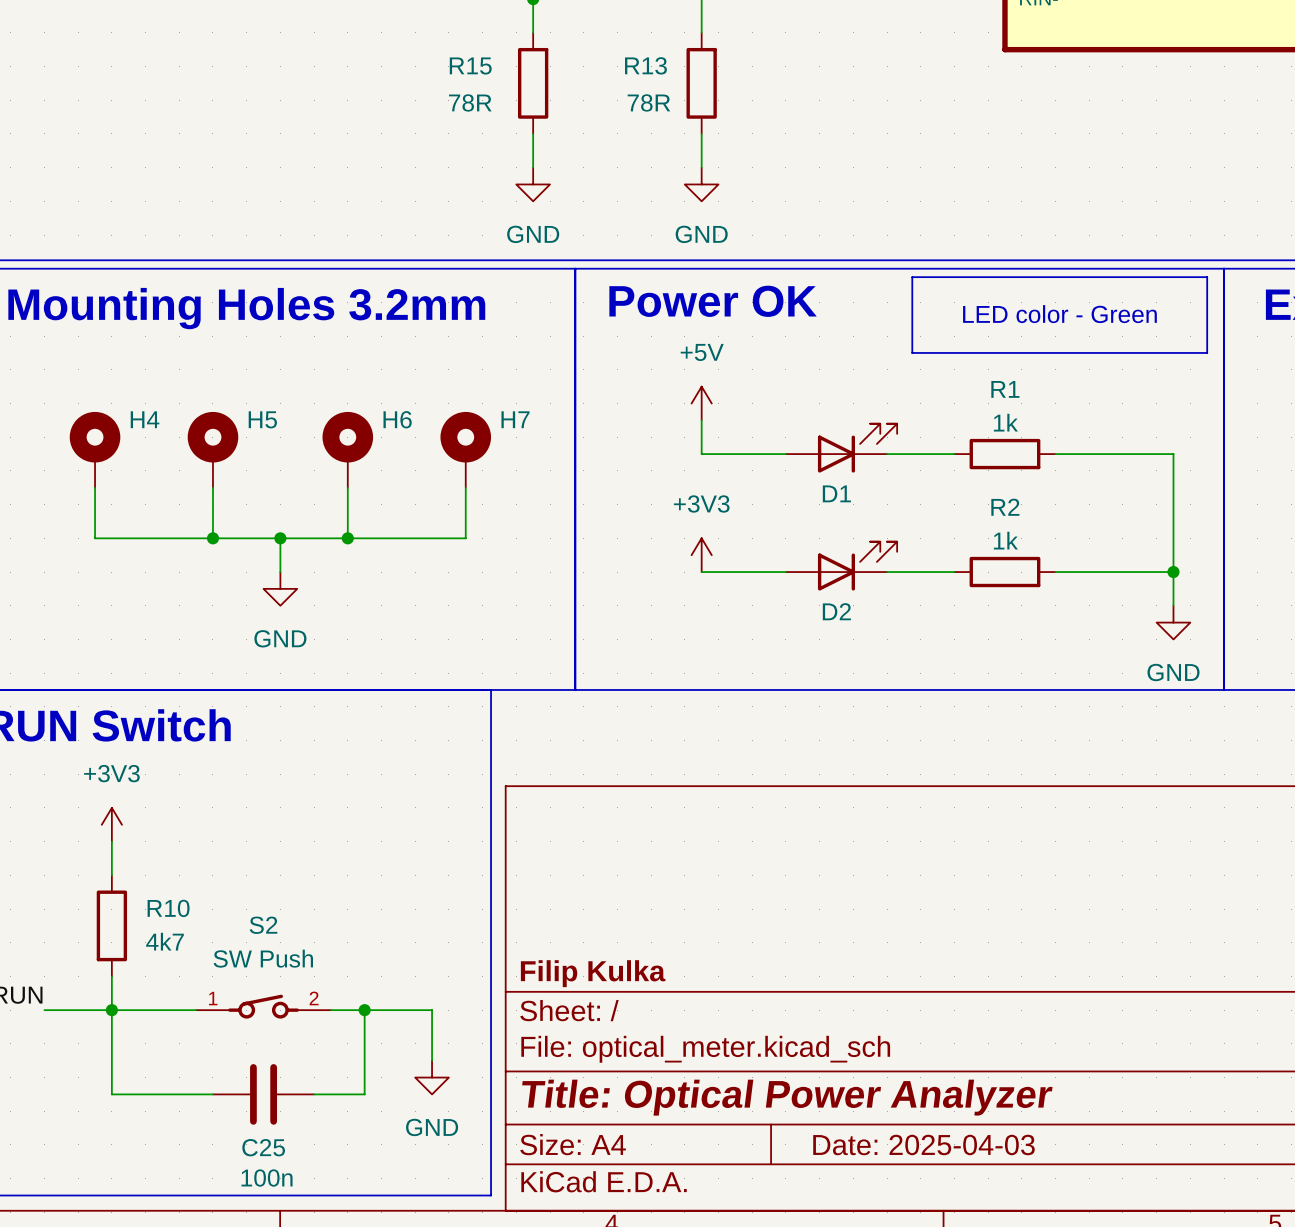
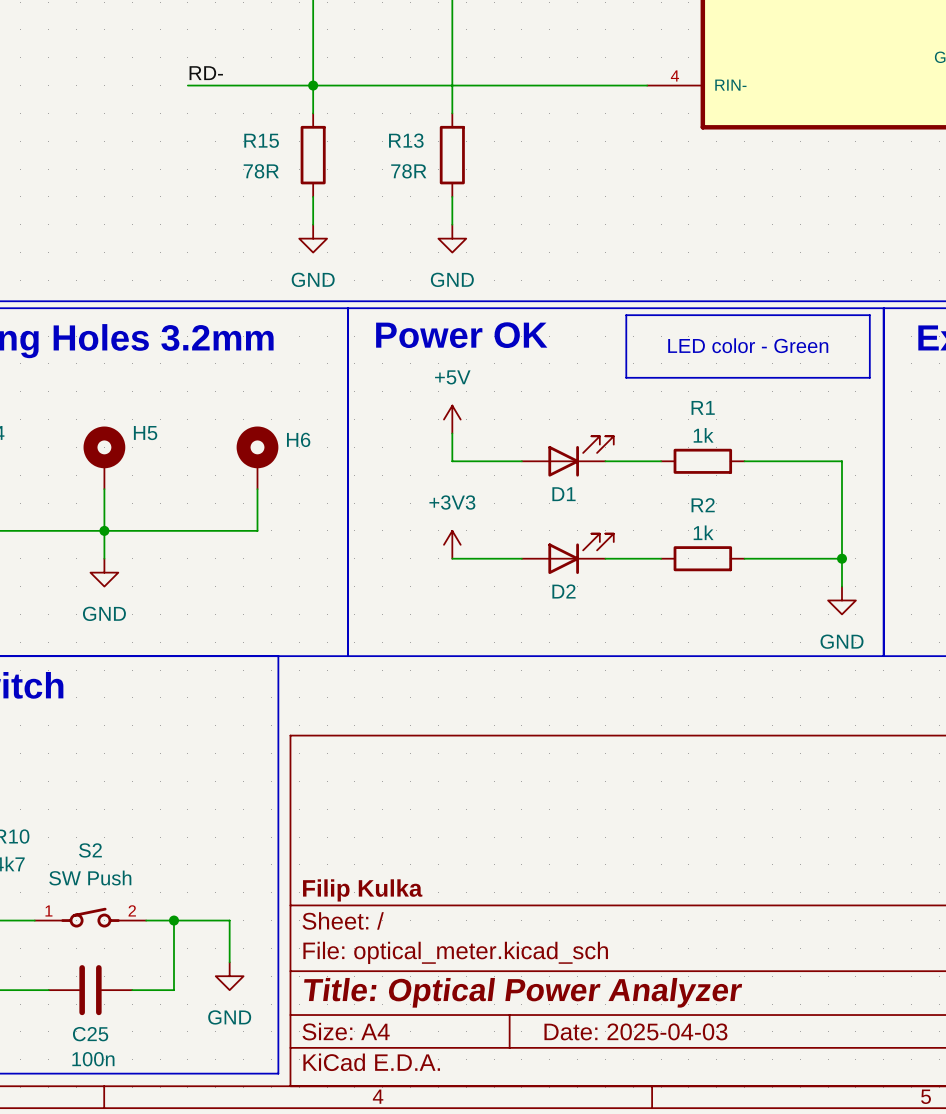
H7 name: H7 (515, 419) -> H6 (298, 439)
H5 position: (212, 449) -> (104, 457)
H6: (347, 449) -> none
wire: (212, 487) (212, 538) -> none
wire: (347, 487) (347, 538) -> (104, 489) (104, 530)
junction: (212, 538) -> none
junction: (347, 538) -> none

